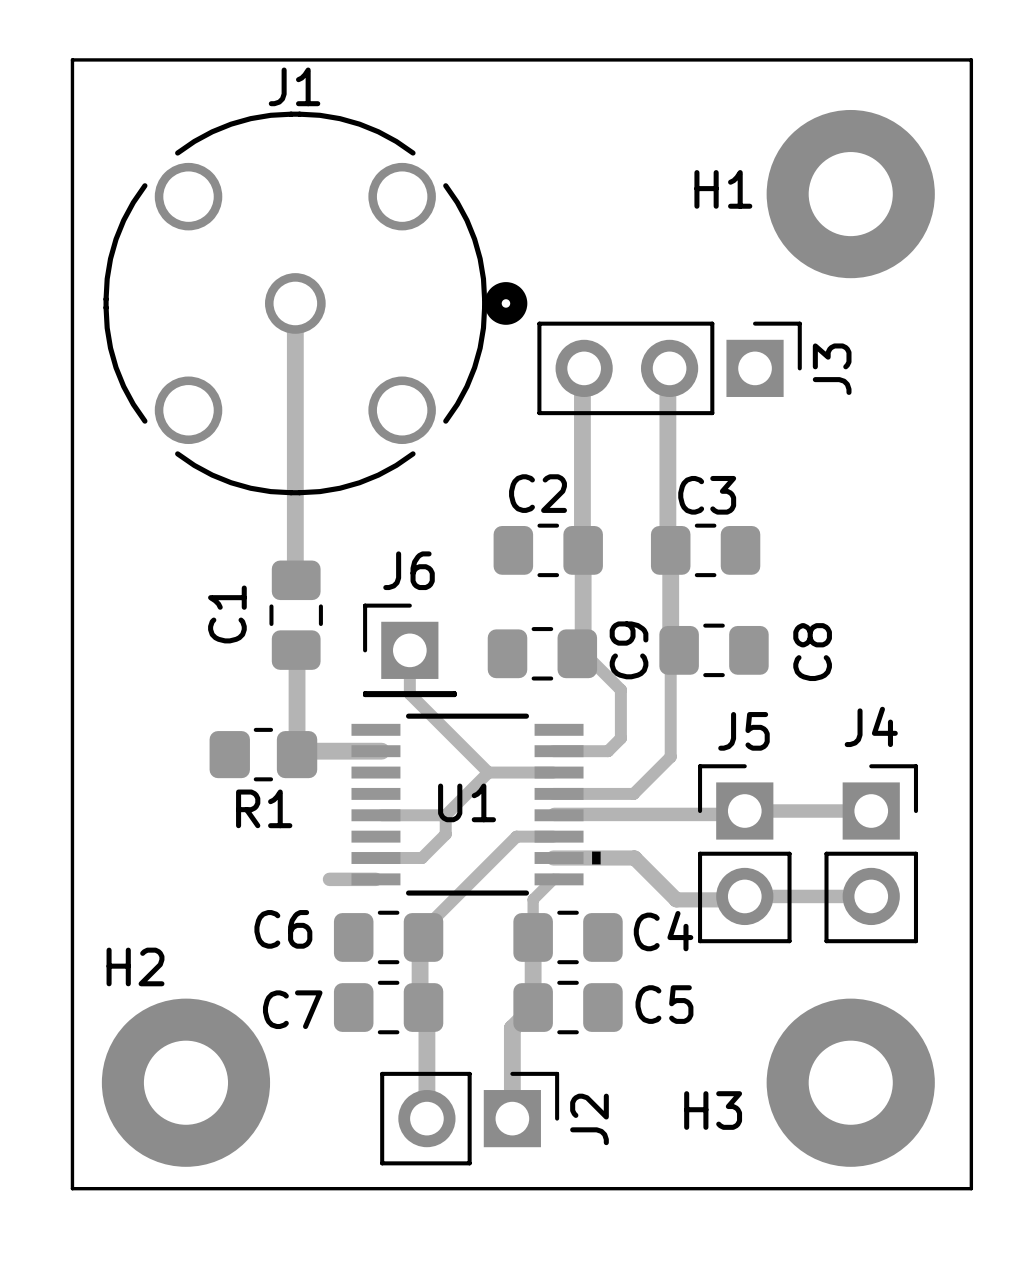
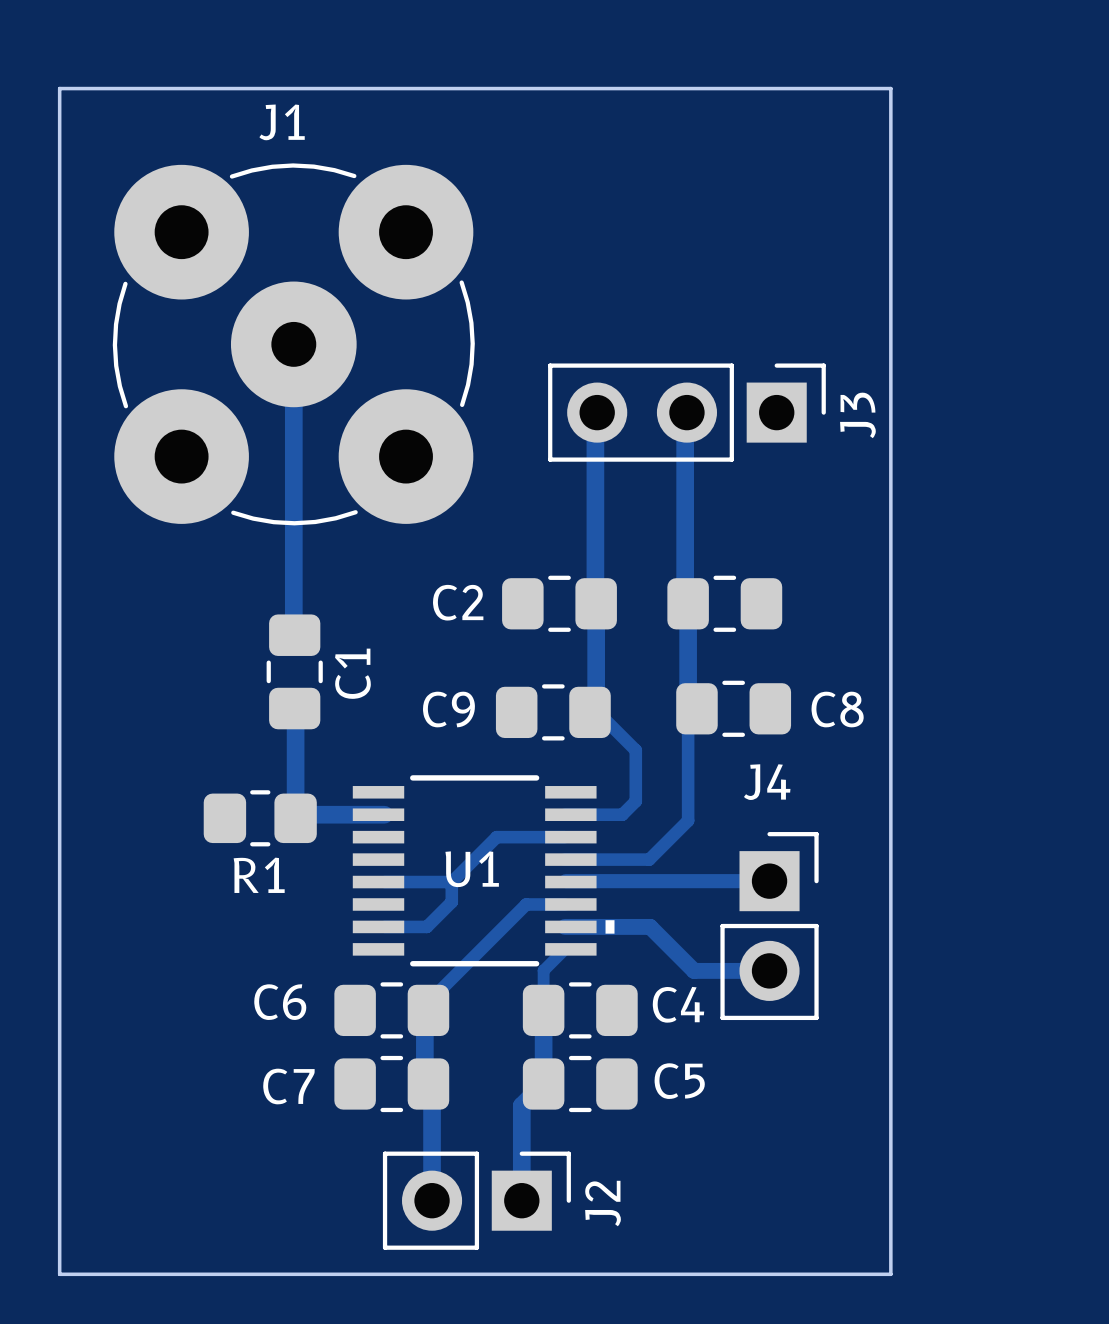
board edge: (863, 59) (971, 59) (971, 1188) (863, 1188) -> (890, 88) (890, 1274)
J1 footprint: [103, 111, 528, 496] -> [112, 163, 475, 526]
H1: (850, 194) -> none
C2 name position: C2 (538, 493) -> C2 (458, 602)
C3 name: C3 (707, 495) -> none
C1 name position: C1 (227, 614) -> C1 (352, 673)
track: (409, 650) (409, 693) (488, 772) -> none
J6: (409, 650) -> none
C9 name rotation: 0° (629, 650) -> 90° clockwise (448, 709)
C9 name position: C9 (629, 650) -> C9 (448, 709)
C8 name rotation: 0° (812, 652) -> 90° clockwise (837, 709)
J4 name position: J4 (871, 726) -> J4 (767, 782)
track: (744, 811) (871, 811) -> none
J5: (744, 853) -> none
J4 position: (871, 853) -> (769, 926)
track: (329, 879) (375, 879) -> none
track: (744, 896) (871, 896) -> none
H2: (185, 1082) -> none
H3: (850, 1082) -> none

